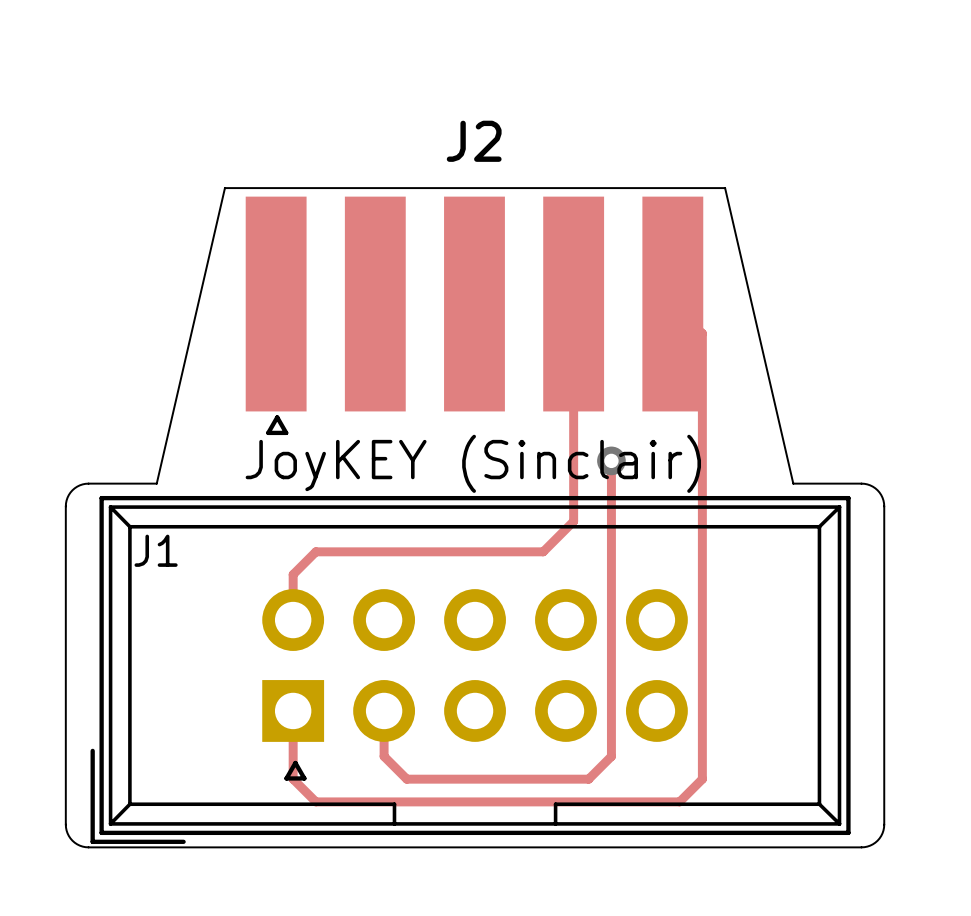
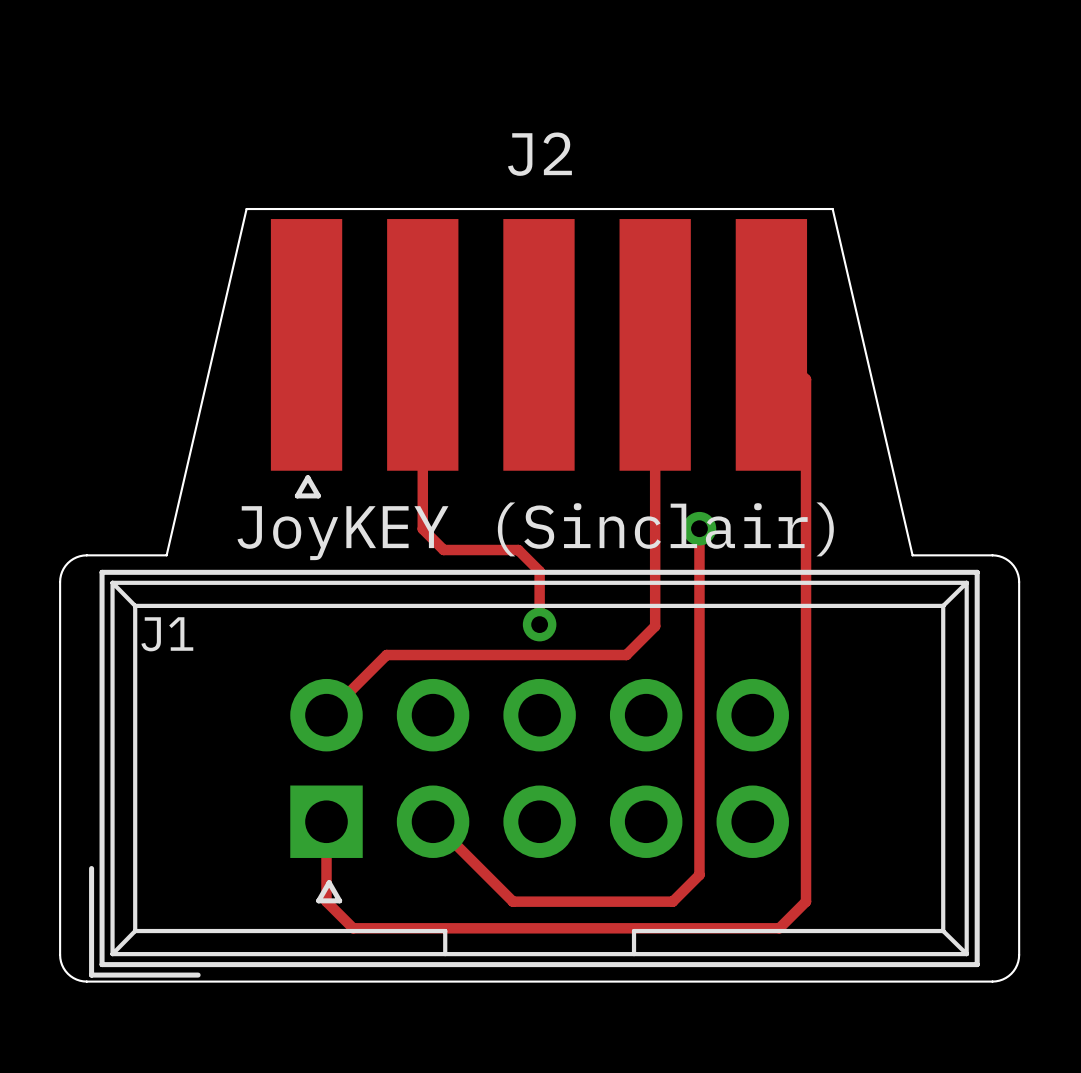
track: none -> (422, 344) (422, 529) (443, 550) (518, 550) (539, 571) (539, 624)
track: (573, 521) (543, 551) (315, 551) (293, 574) (293, 620) -> (655, 599) (655, 626) (626, 655) (386, 655) (326, 715)
via: none -> (539, 624)
track: (384, 710) (384, 756) (406, 779) (452, 779) -> (433, 821) (512, 901)

